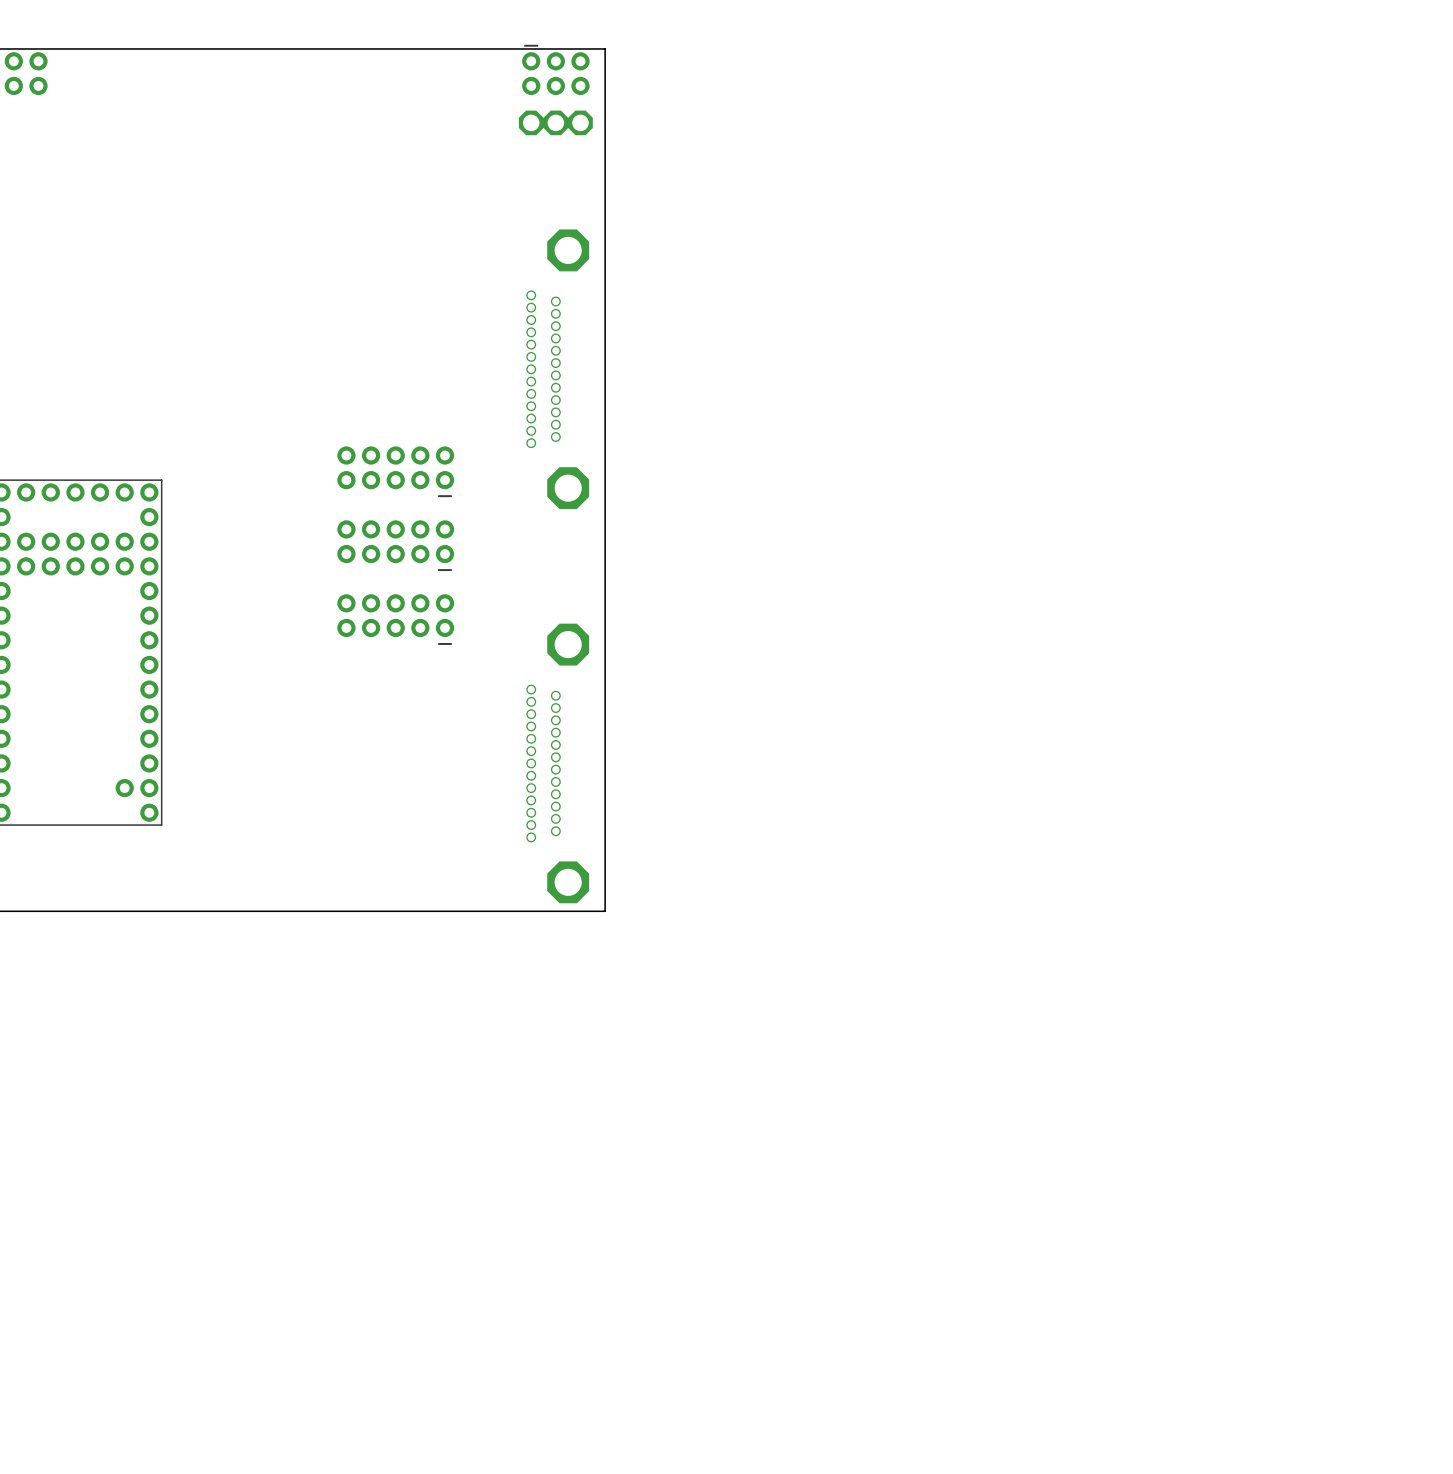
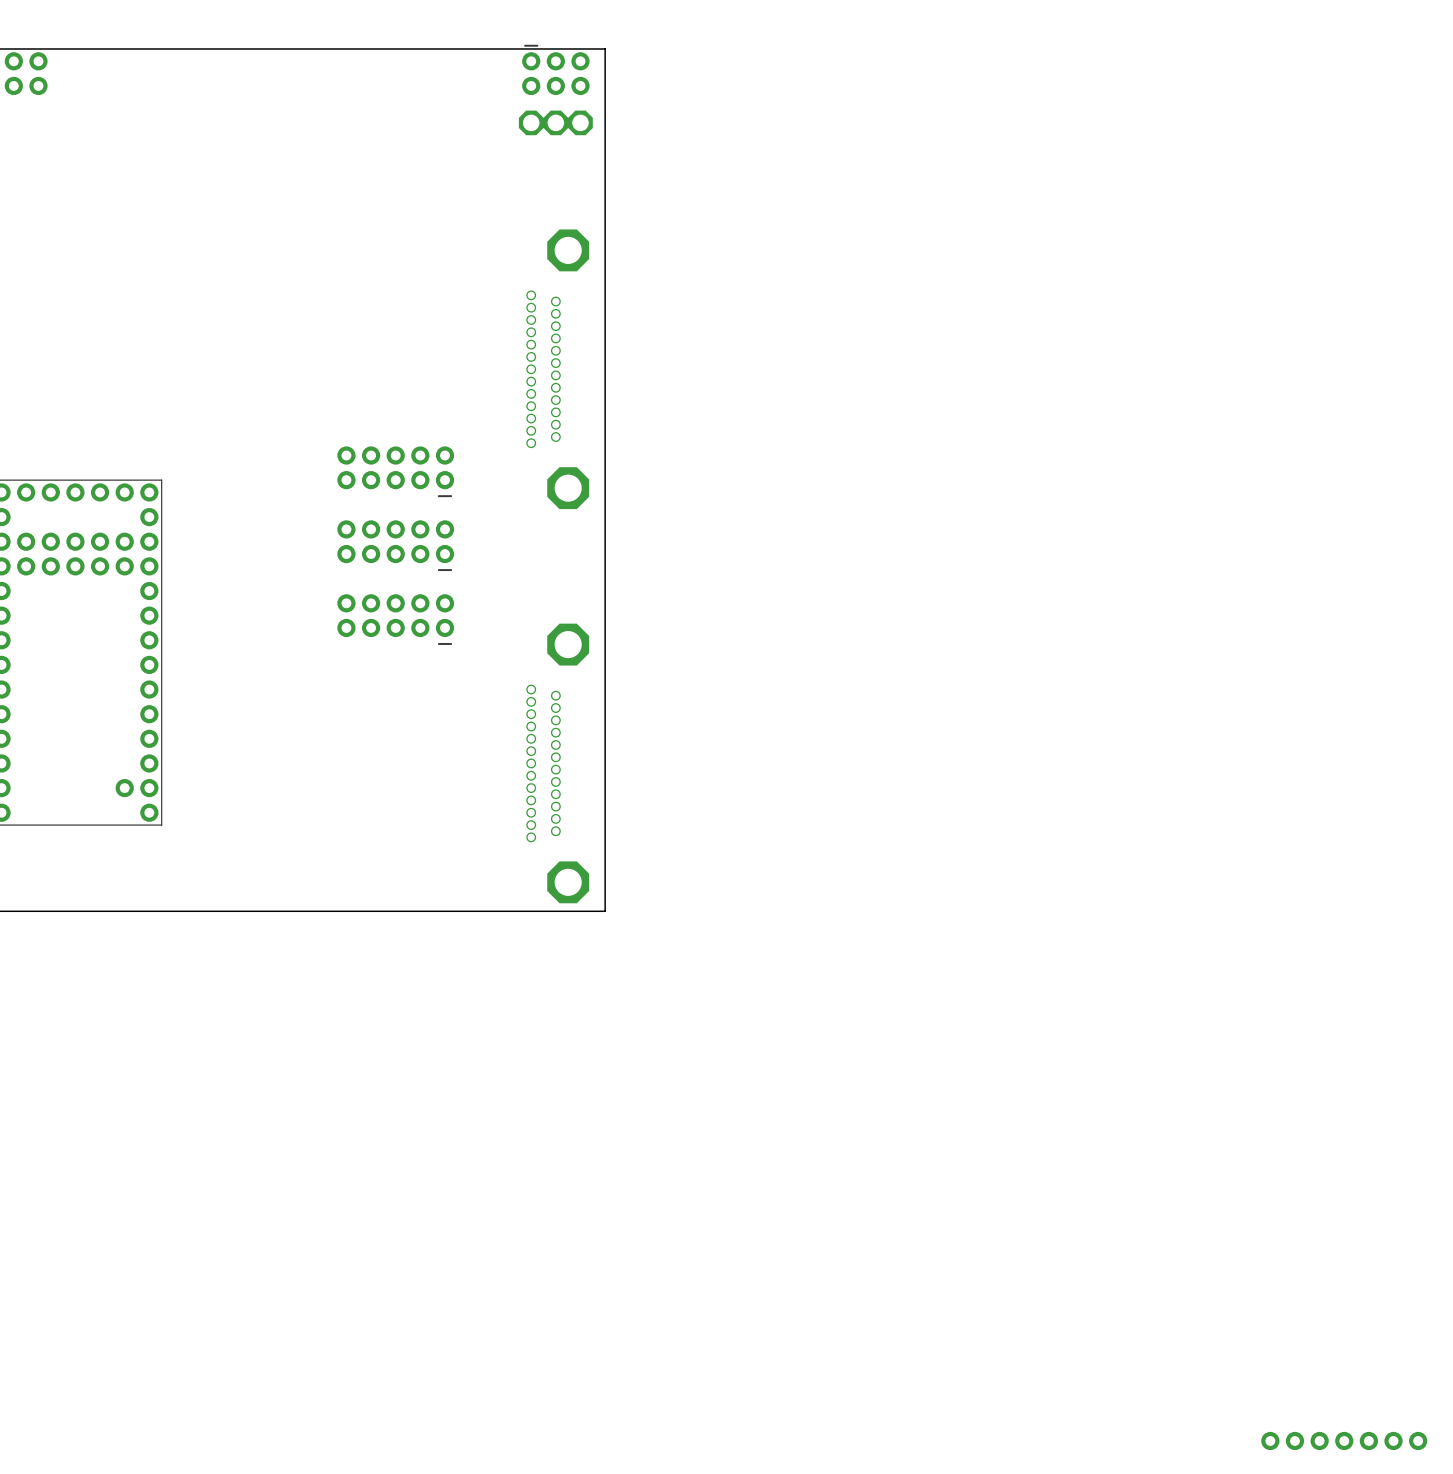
part: none -> (1344, 1440)

